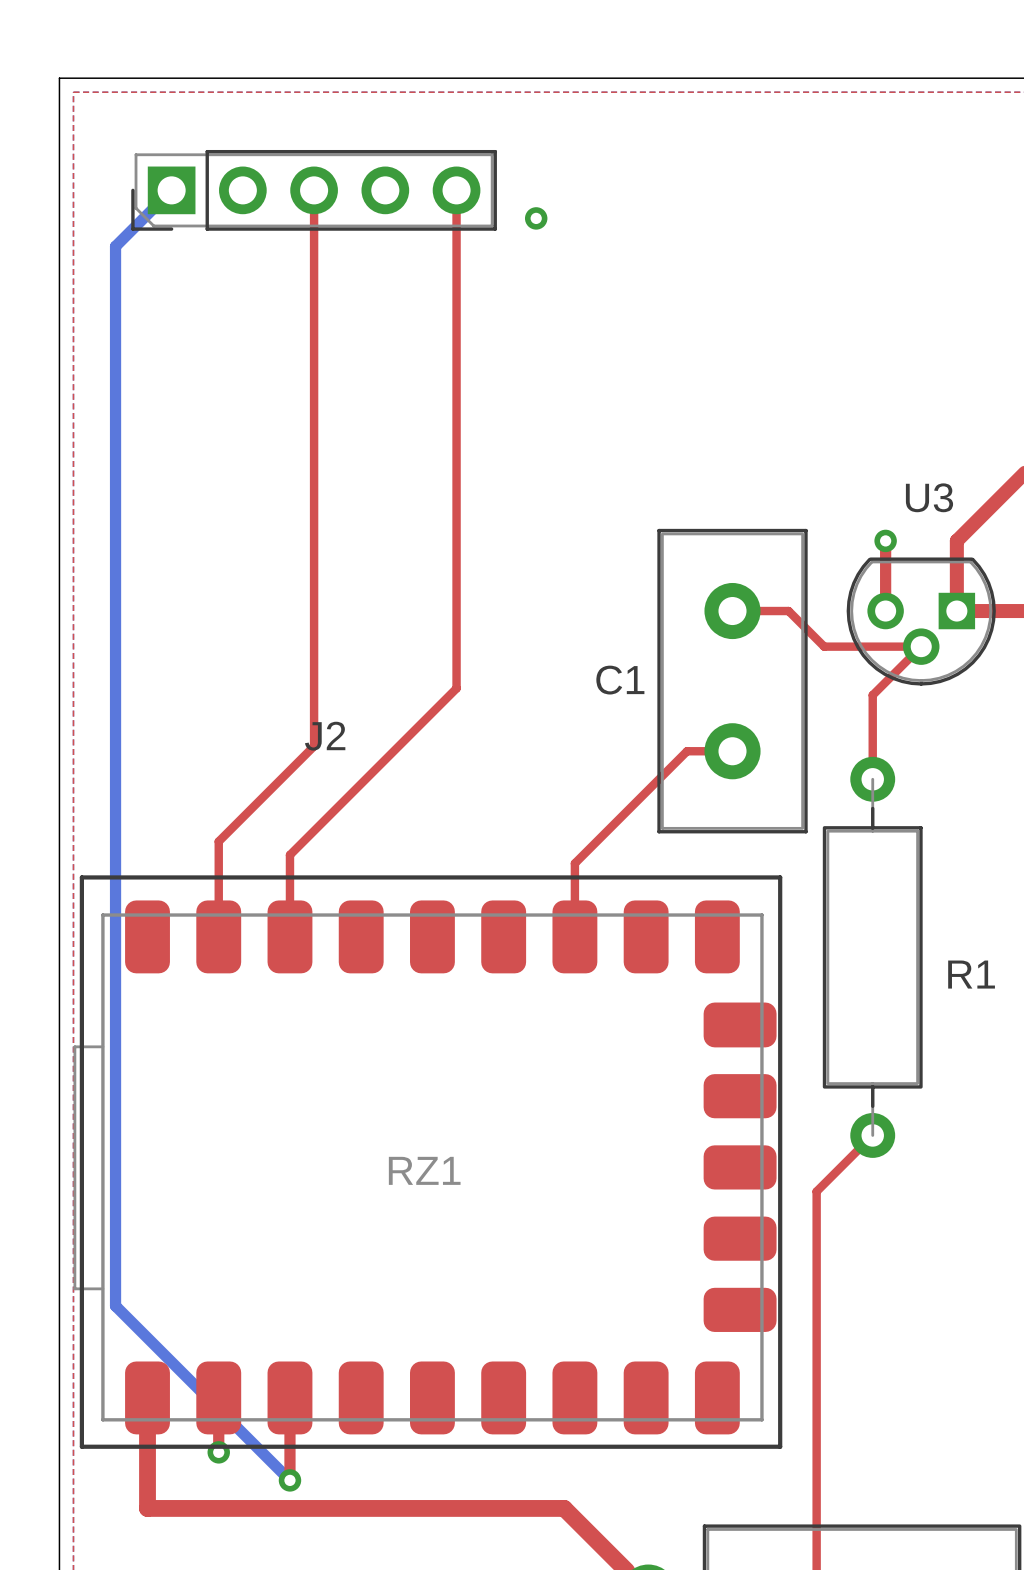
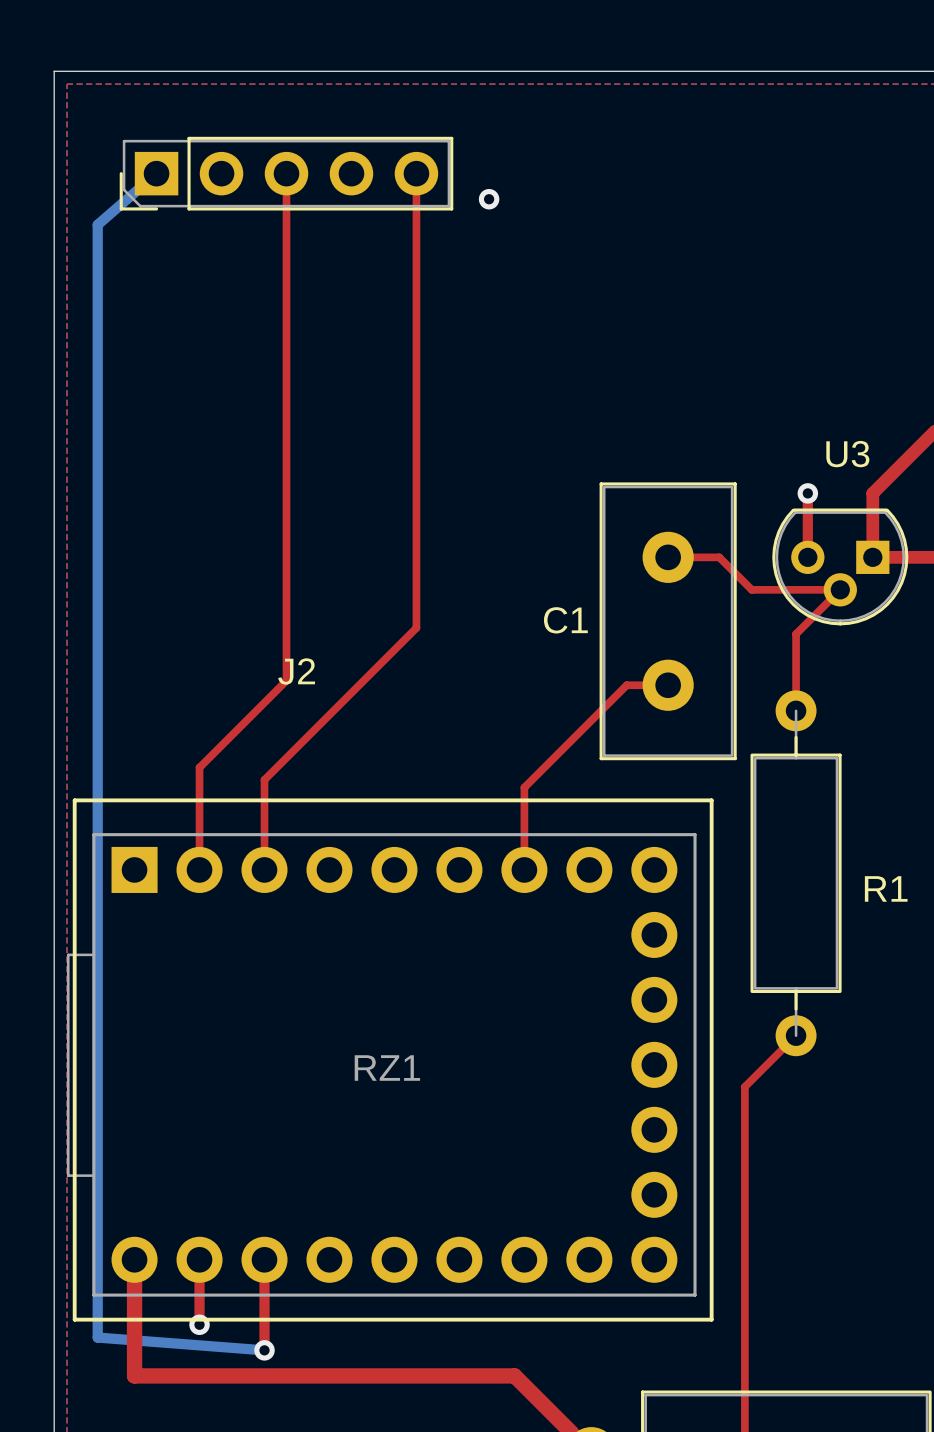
bottom track: (171, 190) (115, 246) (115, 1305) (289, 1480) -> (156, 173) (97, 224) (97, 1337) (264, 1350)
RZ1 footprint: [73, 900, 777, 1435] -> [67, 833, 697, 1297]

